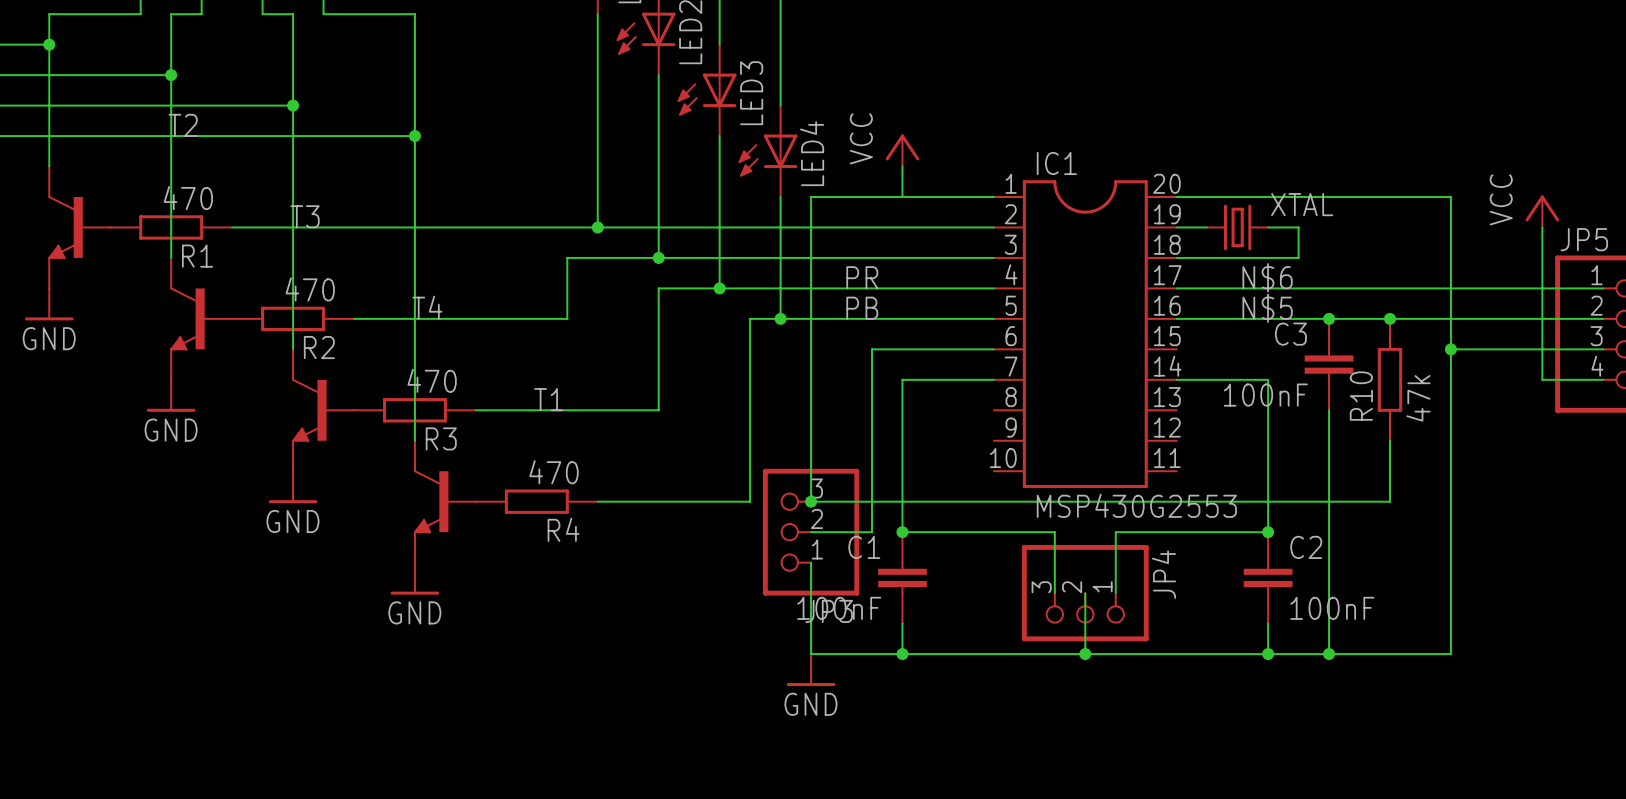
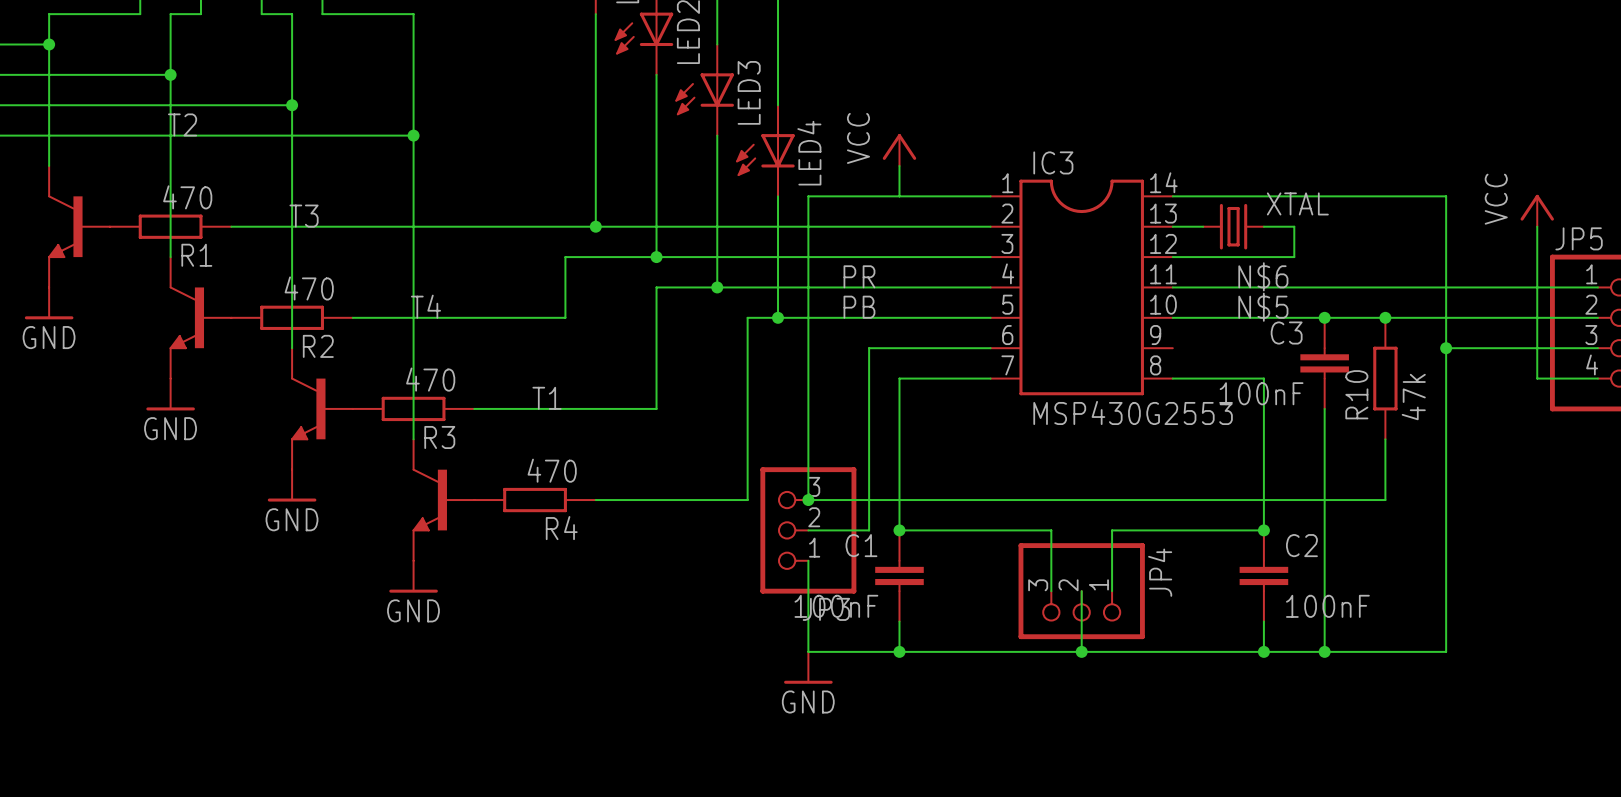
IC3: none -> MSP430G2553 (1081, 287)
IC1: MSP430G2553 (1085, 334) -> none

